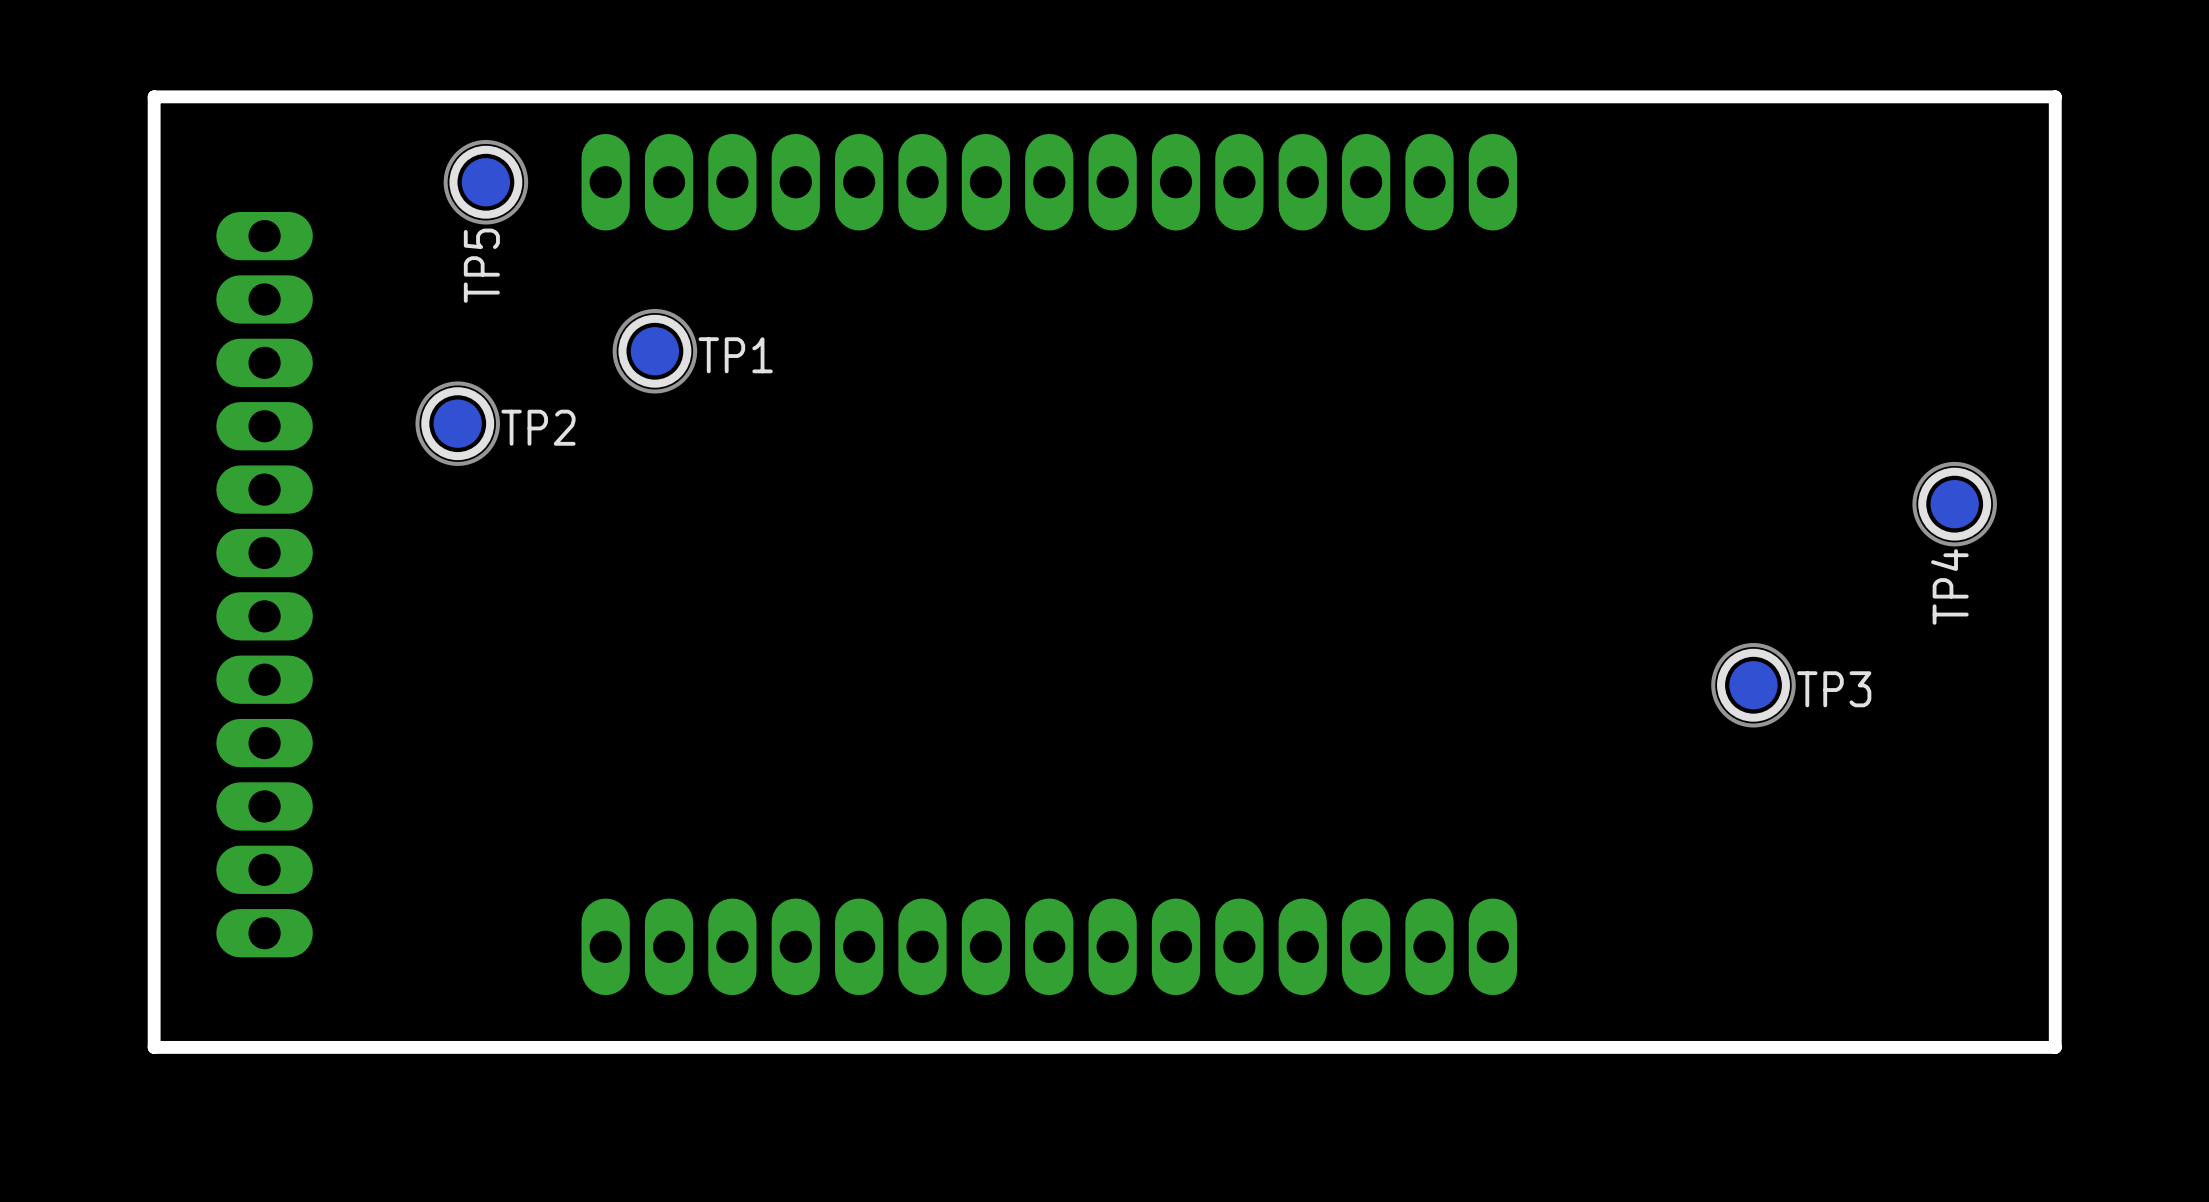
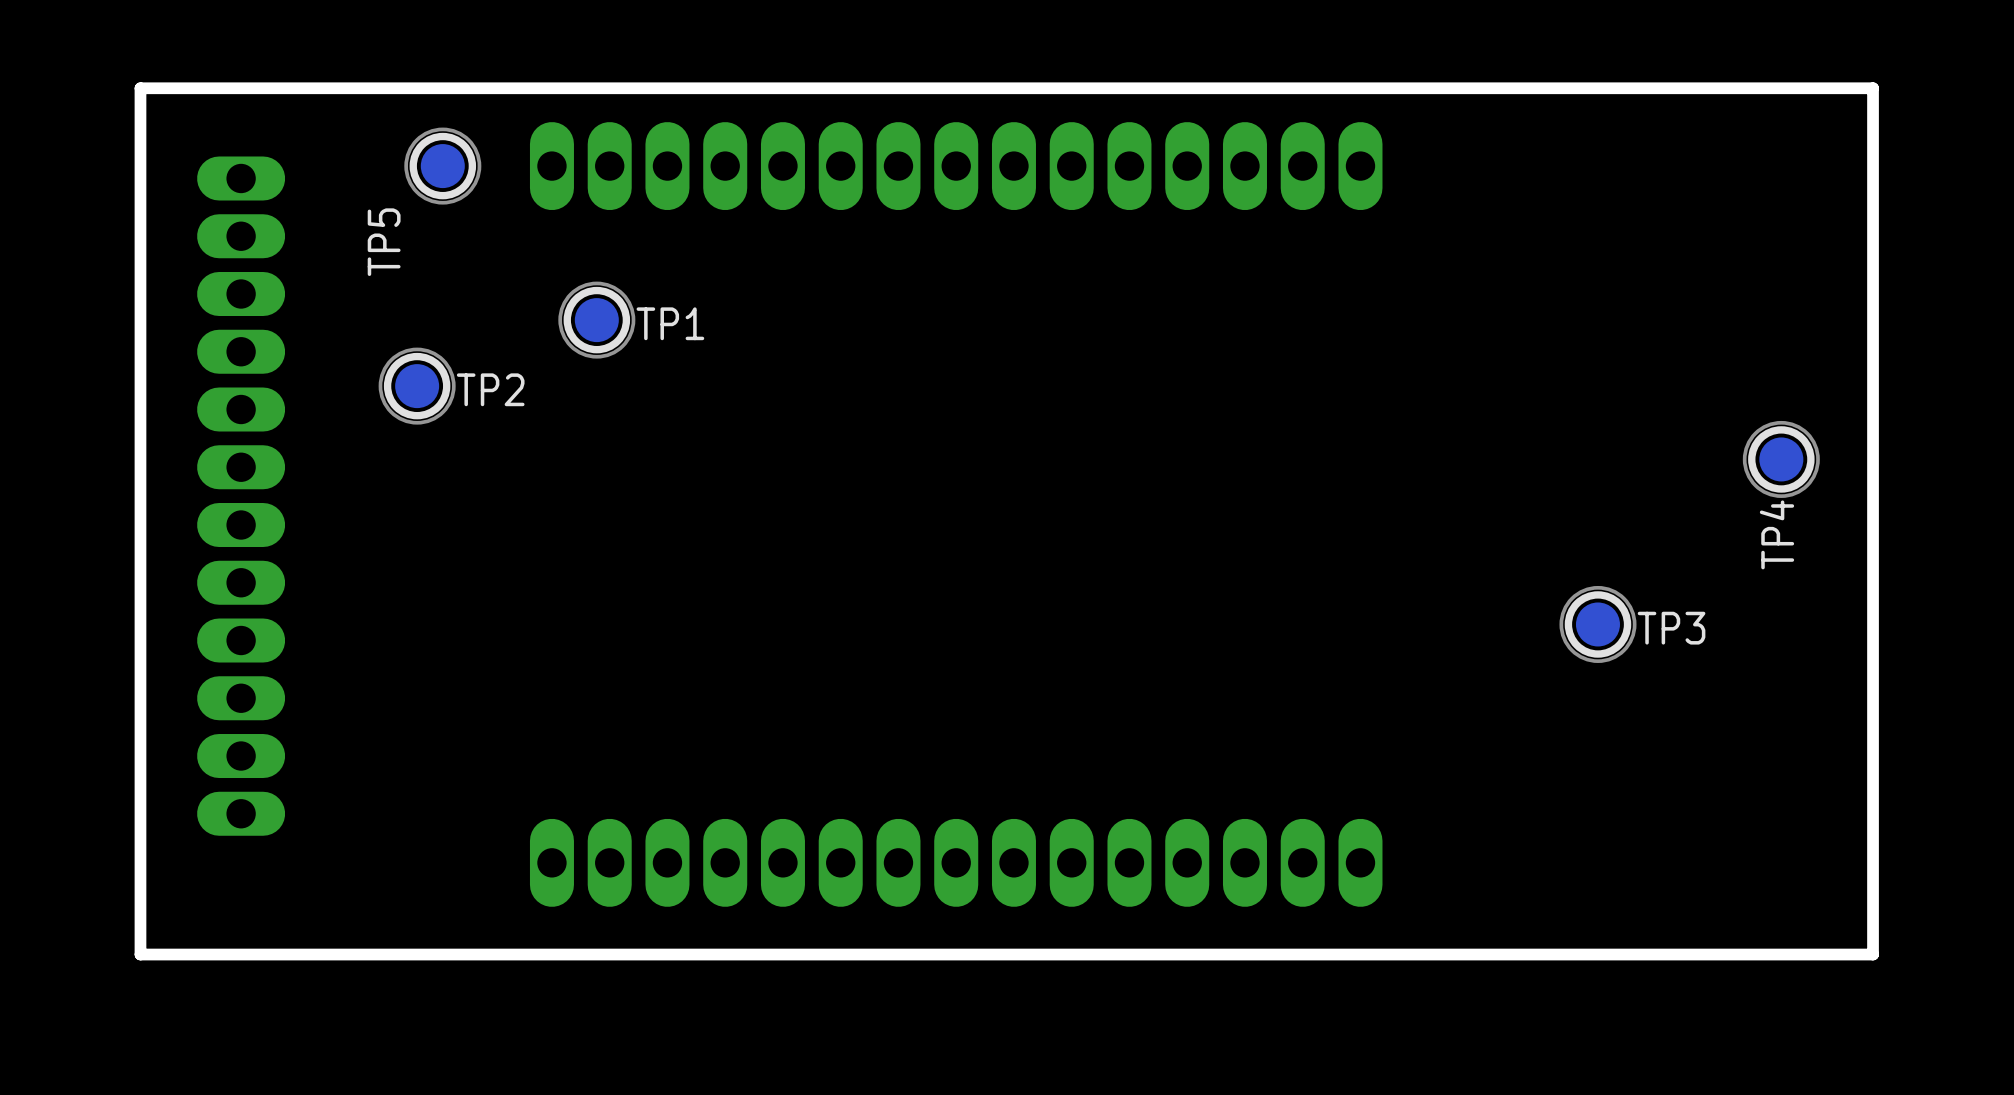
TP5 name position: TP5 (481, 265) -> TP5 (384, 242)
part position: (264, 584) -> (241, 496)

